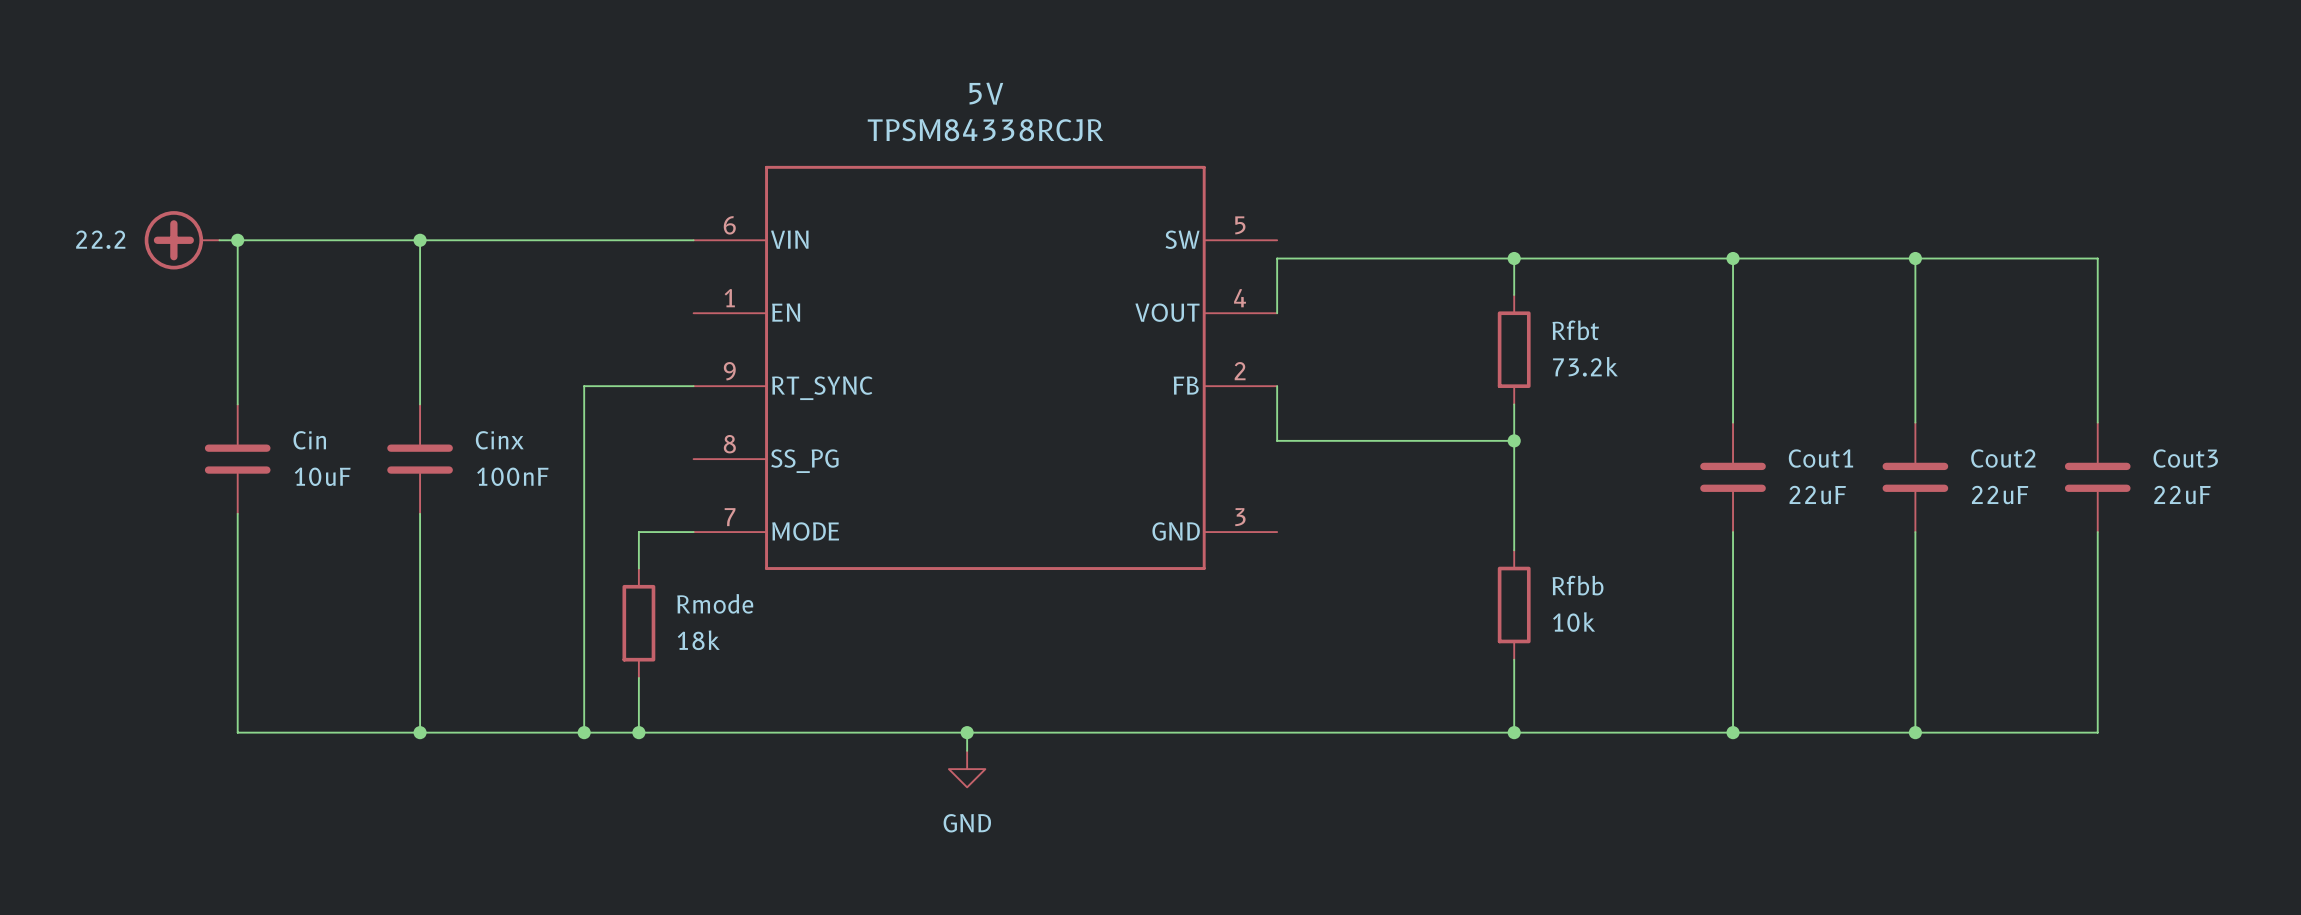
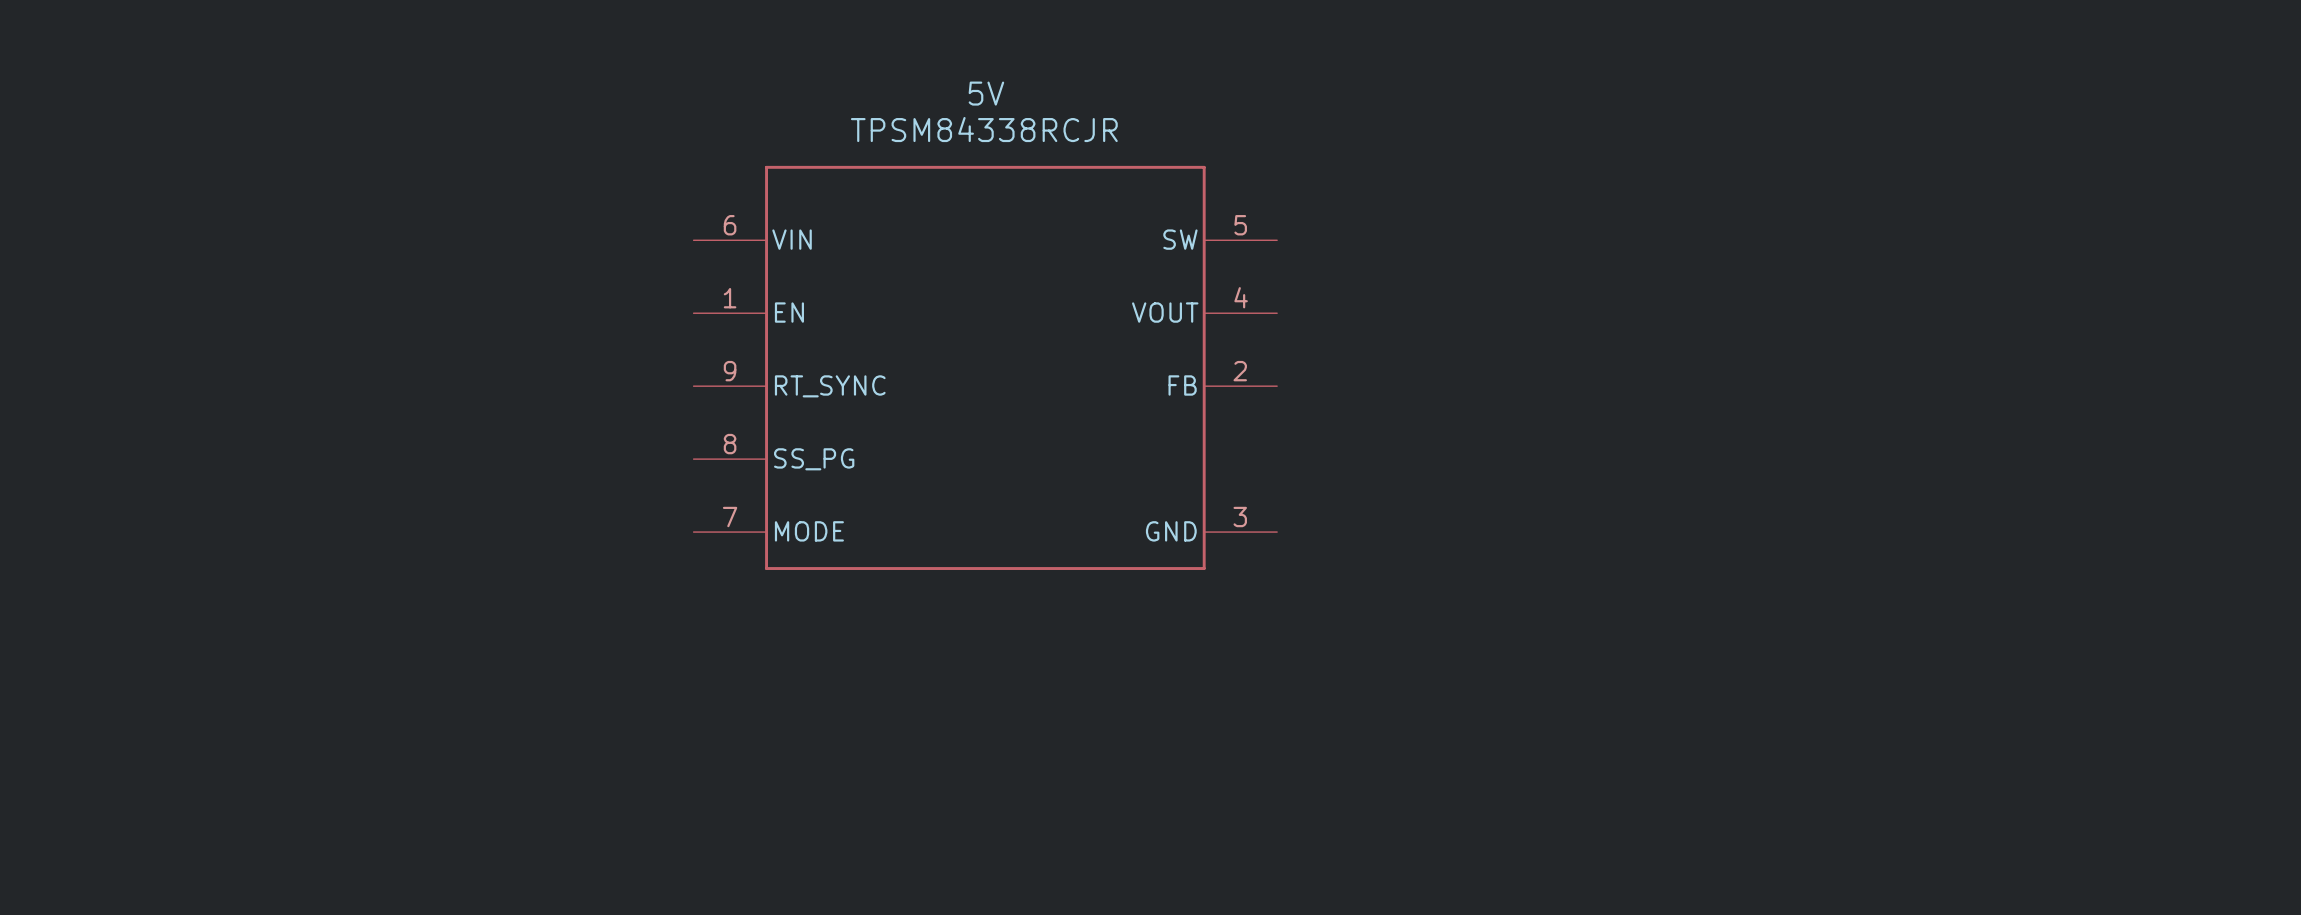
power symbol: 22.2 (182, 240) -> none
wire: (219, 240) (693, 240) -> none
wire: (237, 240) (237, 404) -> none
junction: (237, 240) -> none
wire: (420, 240) (420, 404) -> none
junction: (420, 240) -> none
wire: (1514, 258) (1514, 294) -> none
junction: (1514, 258) -> none
wire: (1733, 258) (1733, 422) -> none
junction: (1733, 258) -> none
wire: (1915, 258) (1915, 422) -> none
junction: (1915, 258) -> none
wire: (1277, 313) (1277, 258) (2097, 258) (2097, 422) -> none
Rfbt: 73.2k (1514, 349) -> none
wire: (693, 386) (584, 386) (584, 732) -> none
wire: (1277, 386) (1277, 440) (1514, 440) -> none
wire: (1514, 404) (1514, 550) -> none
junction: (1514, 440) -> none
Cin: 10uF (237, 459) -> none
Cinx: 100nF (420, 459) -> none
Cout1: 22uF (1733, 477) -> none
Cout2: 22uF (1915, 477) -> none
Cout3: 22uF (2097, 477) -> none
wire: (237, 513) (237, 732) (2097, 732) (2097, 532) -> none
wire: (420, 513) (420, 732) -> none
wire: (693, 532) (638, 532) (638, 568) -> none
wire: (1733, 532) (1733, 732) -> none
wire: (1915, 532) (1915, 732) -> none
Rfbb: 10k (1514, 604) -> none
Rmode: 18k (638, 623) -> none
wire: (1514, 659) (1514, 732) -> none
wire: (638, 677) (638, 732) -> none
junction: (420, 732) -> none
junction: (584, 732) -> none
junction: (638, 732) -> none
wire: (967, 732) (967, 750) -> none
junction: (967, 732) -> none
junction: (1514, 732) -> none
junction: (1733, 732) -> none
junction: (1915, 732) -> none
power symbol: GND (967, 769) -> none

